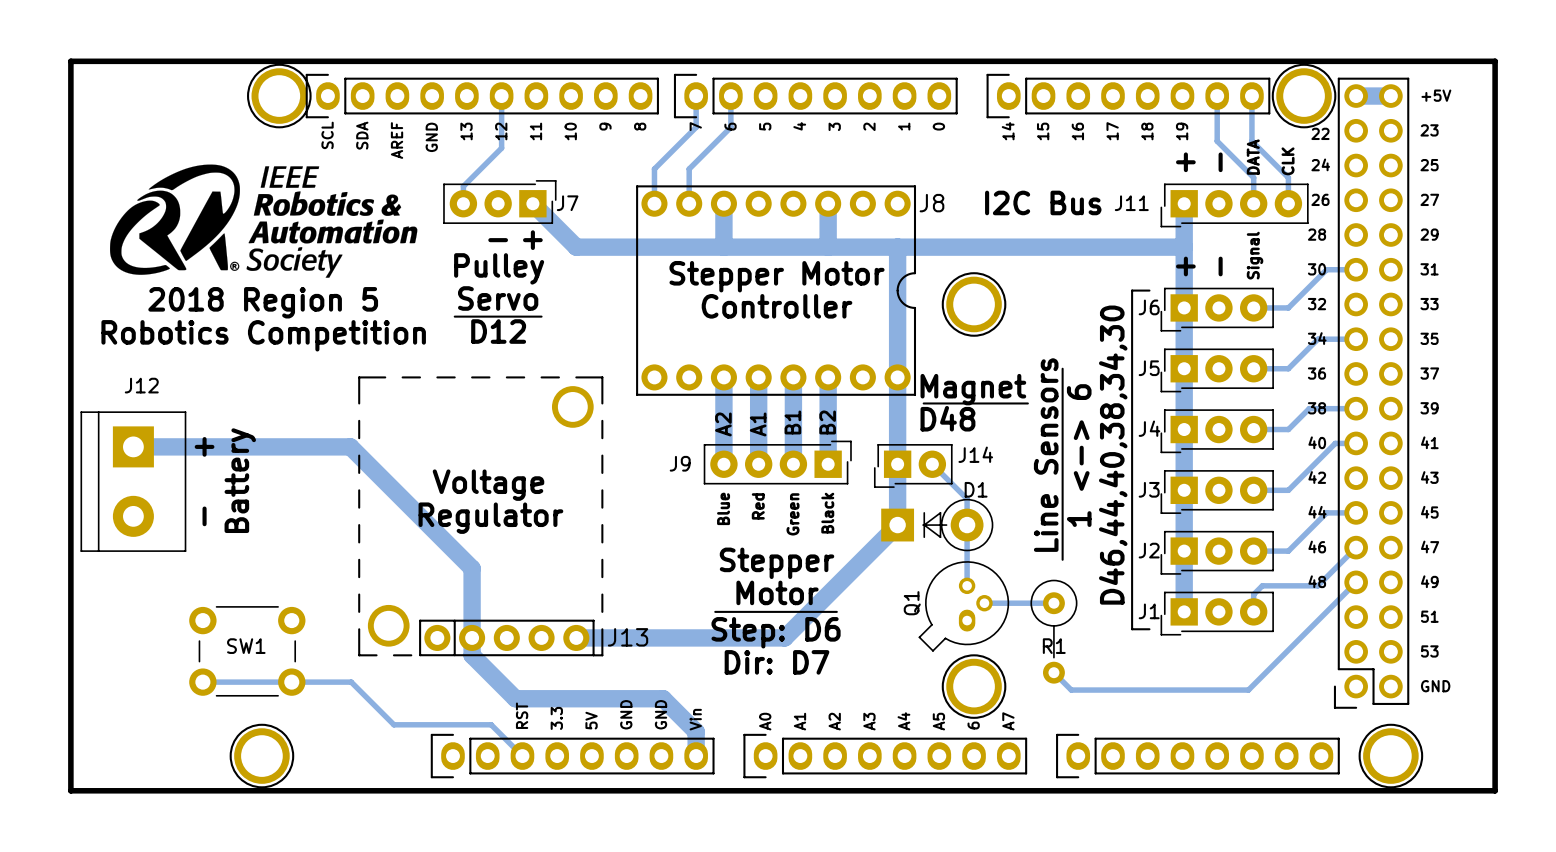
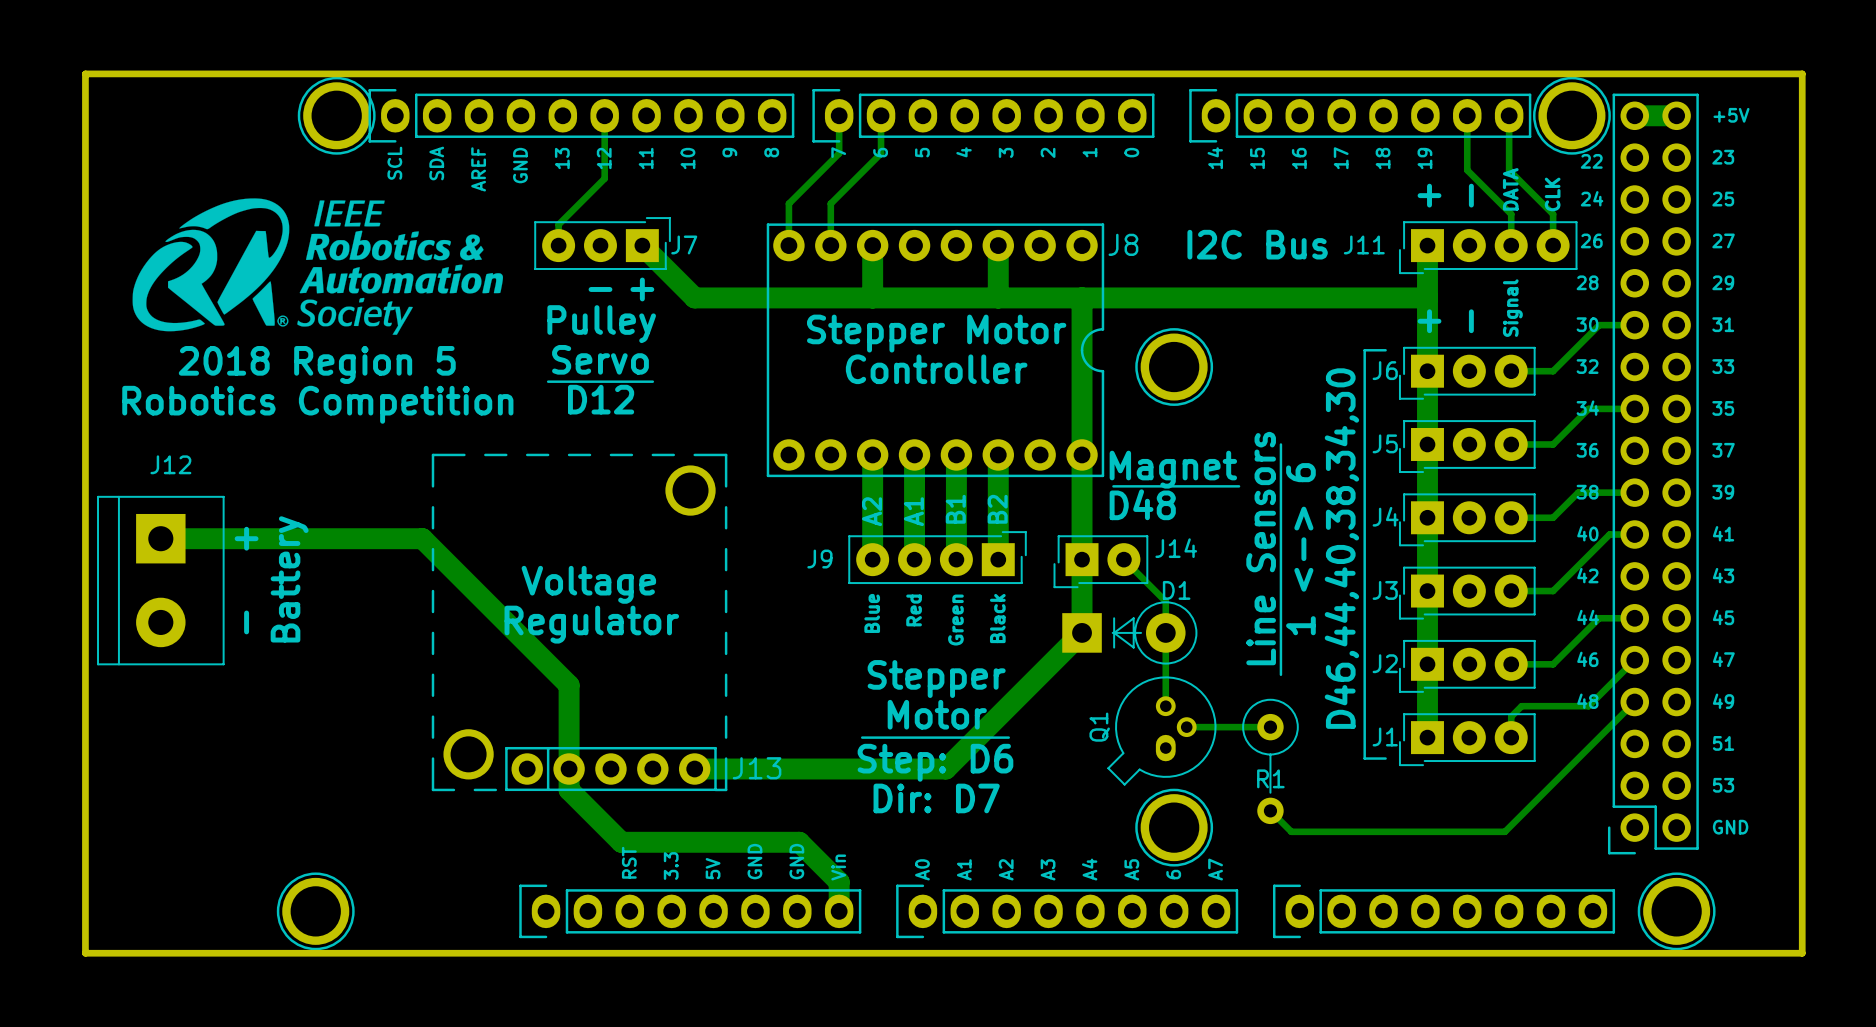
SW1: (247, 651) -> none
bottom track: (202, 682) (351, 682) (393, 724) (491, 724) (522, 756) -> none

